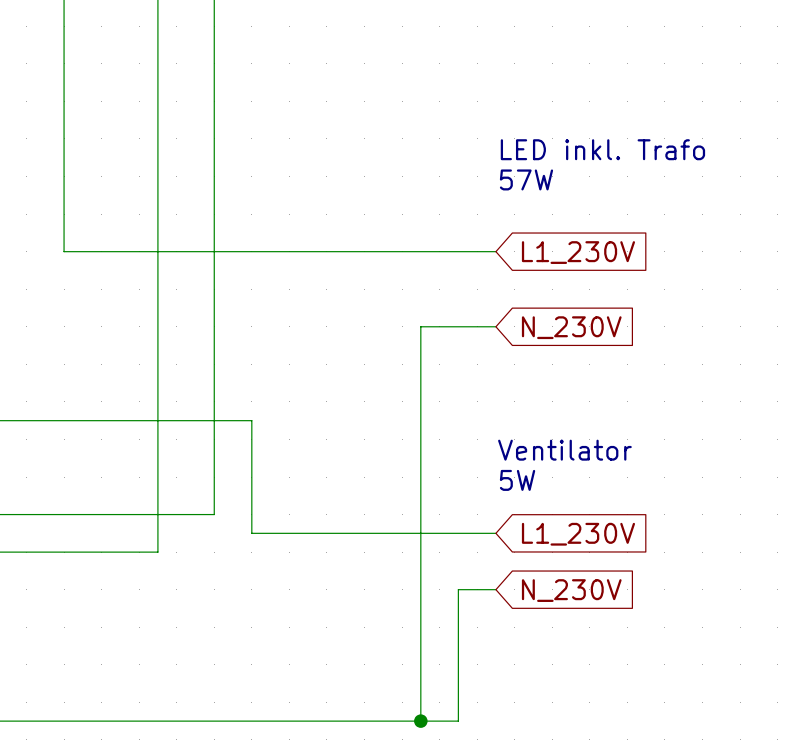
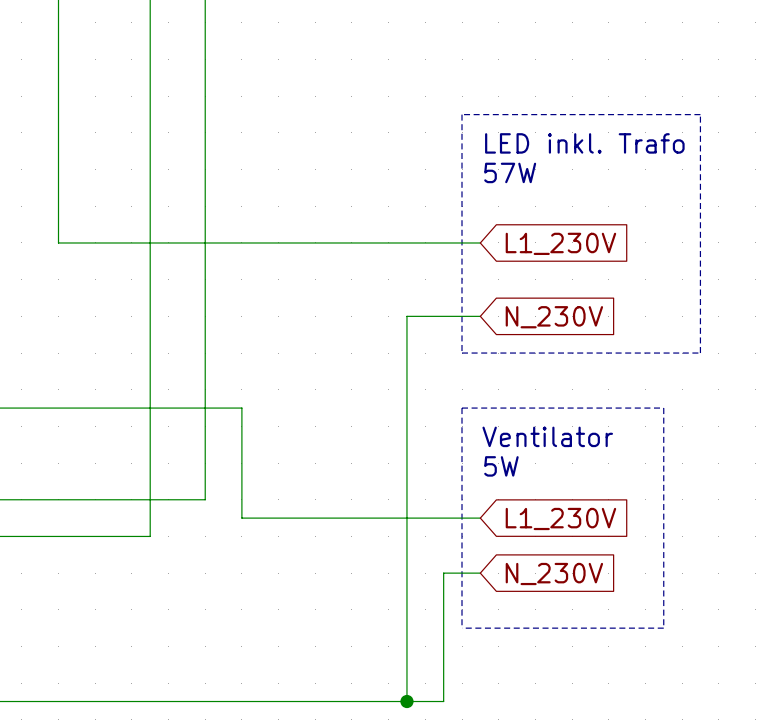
line: none -> (462, 114) (462, 353) (700, 353) (700, 114) (462, 114)
line: none -> (462, 408) (663, 408) (663, 628) (462, 628) (462, 408)

